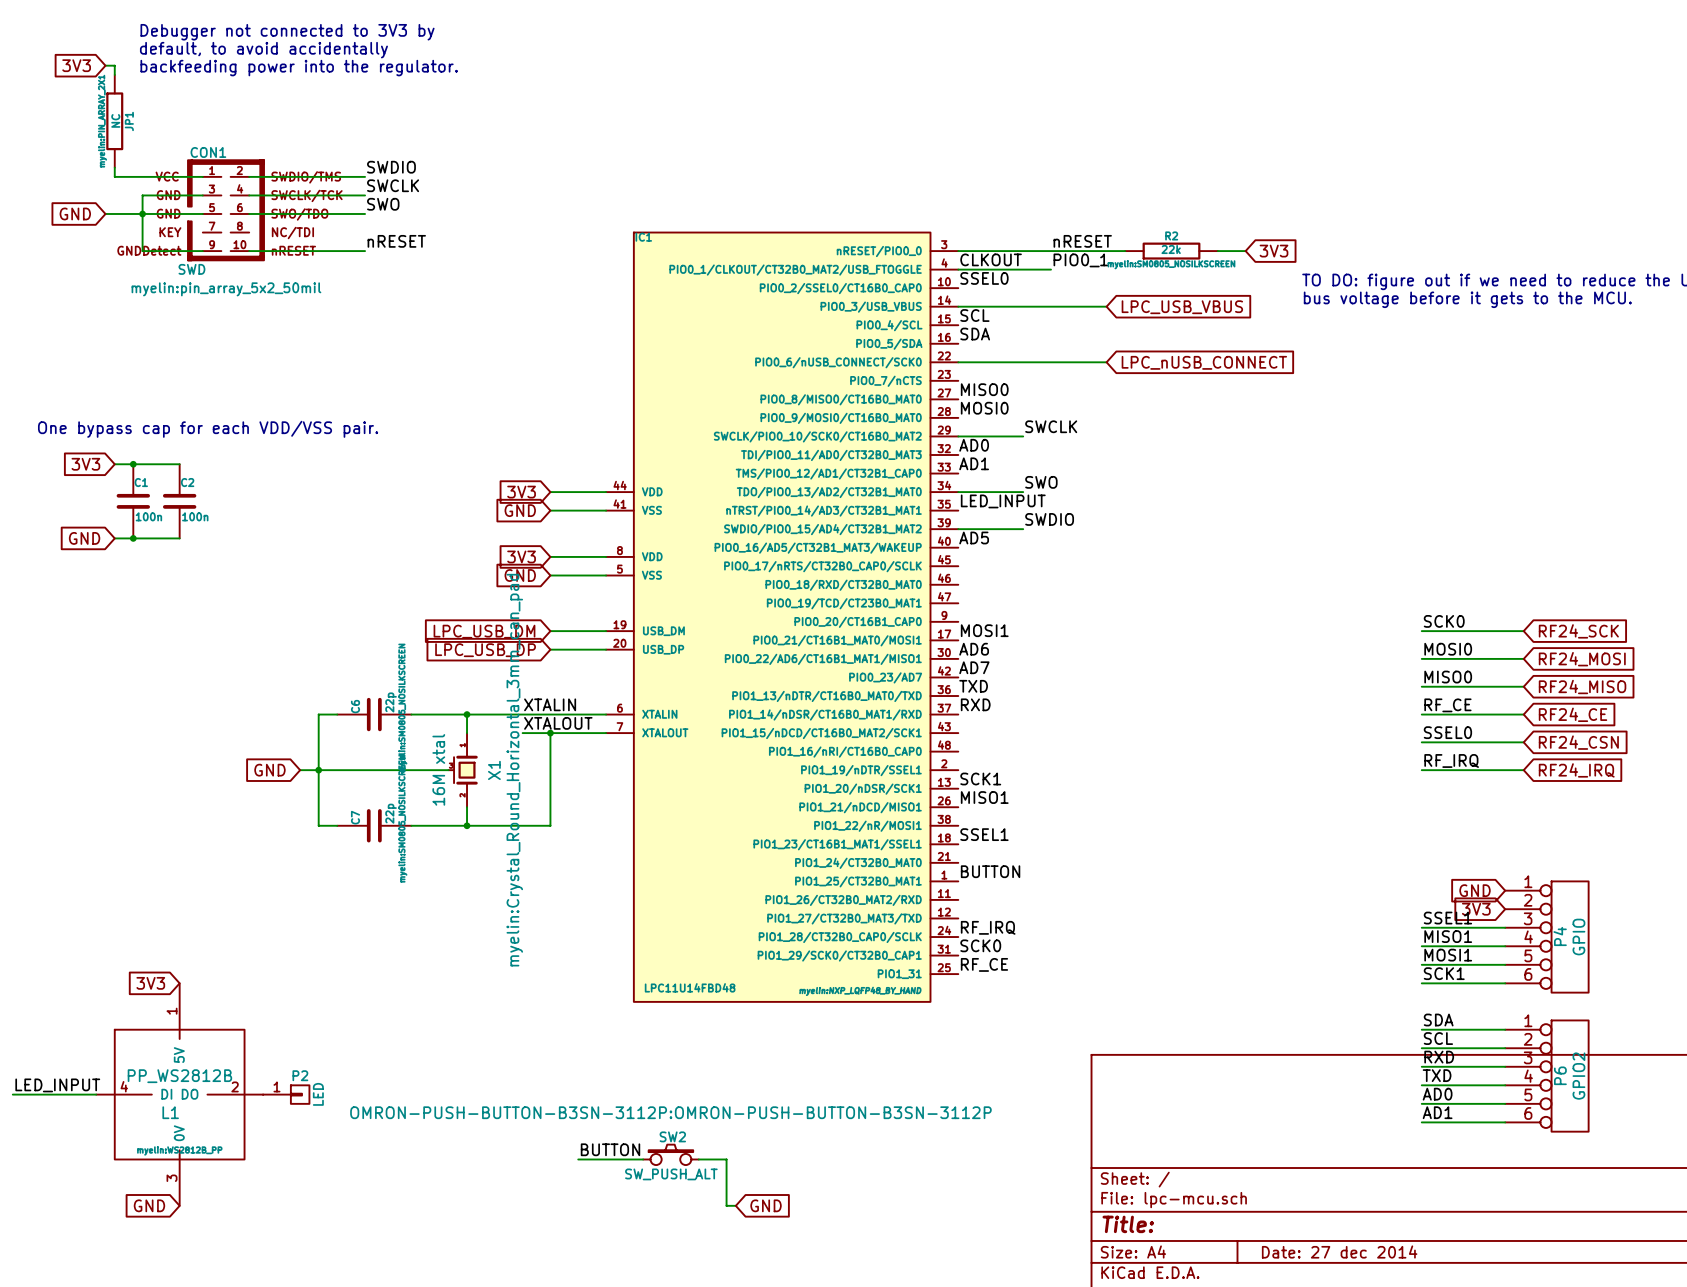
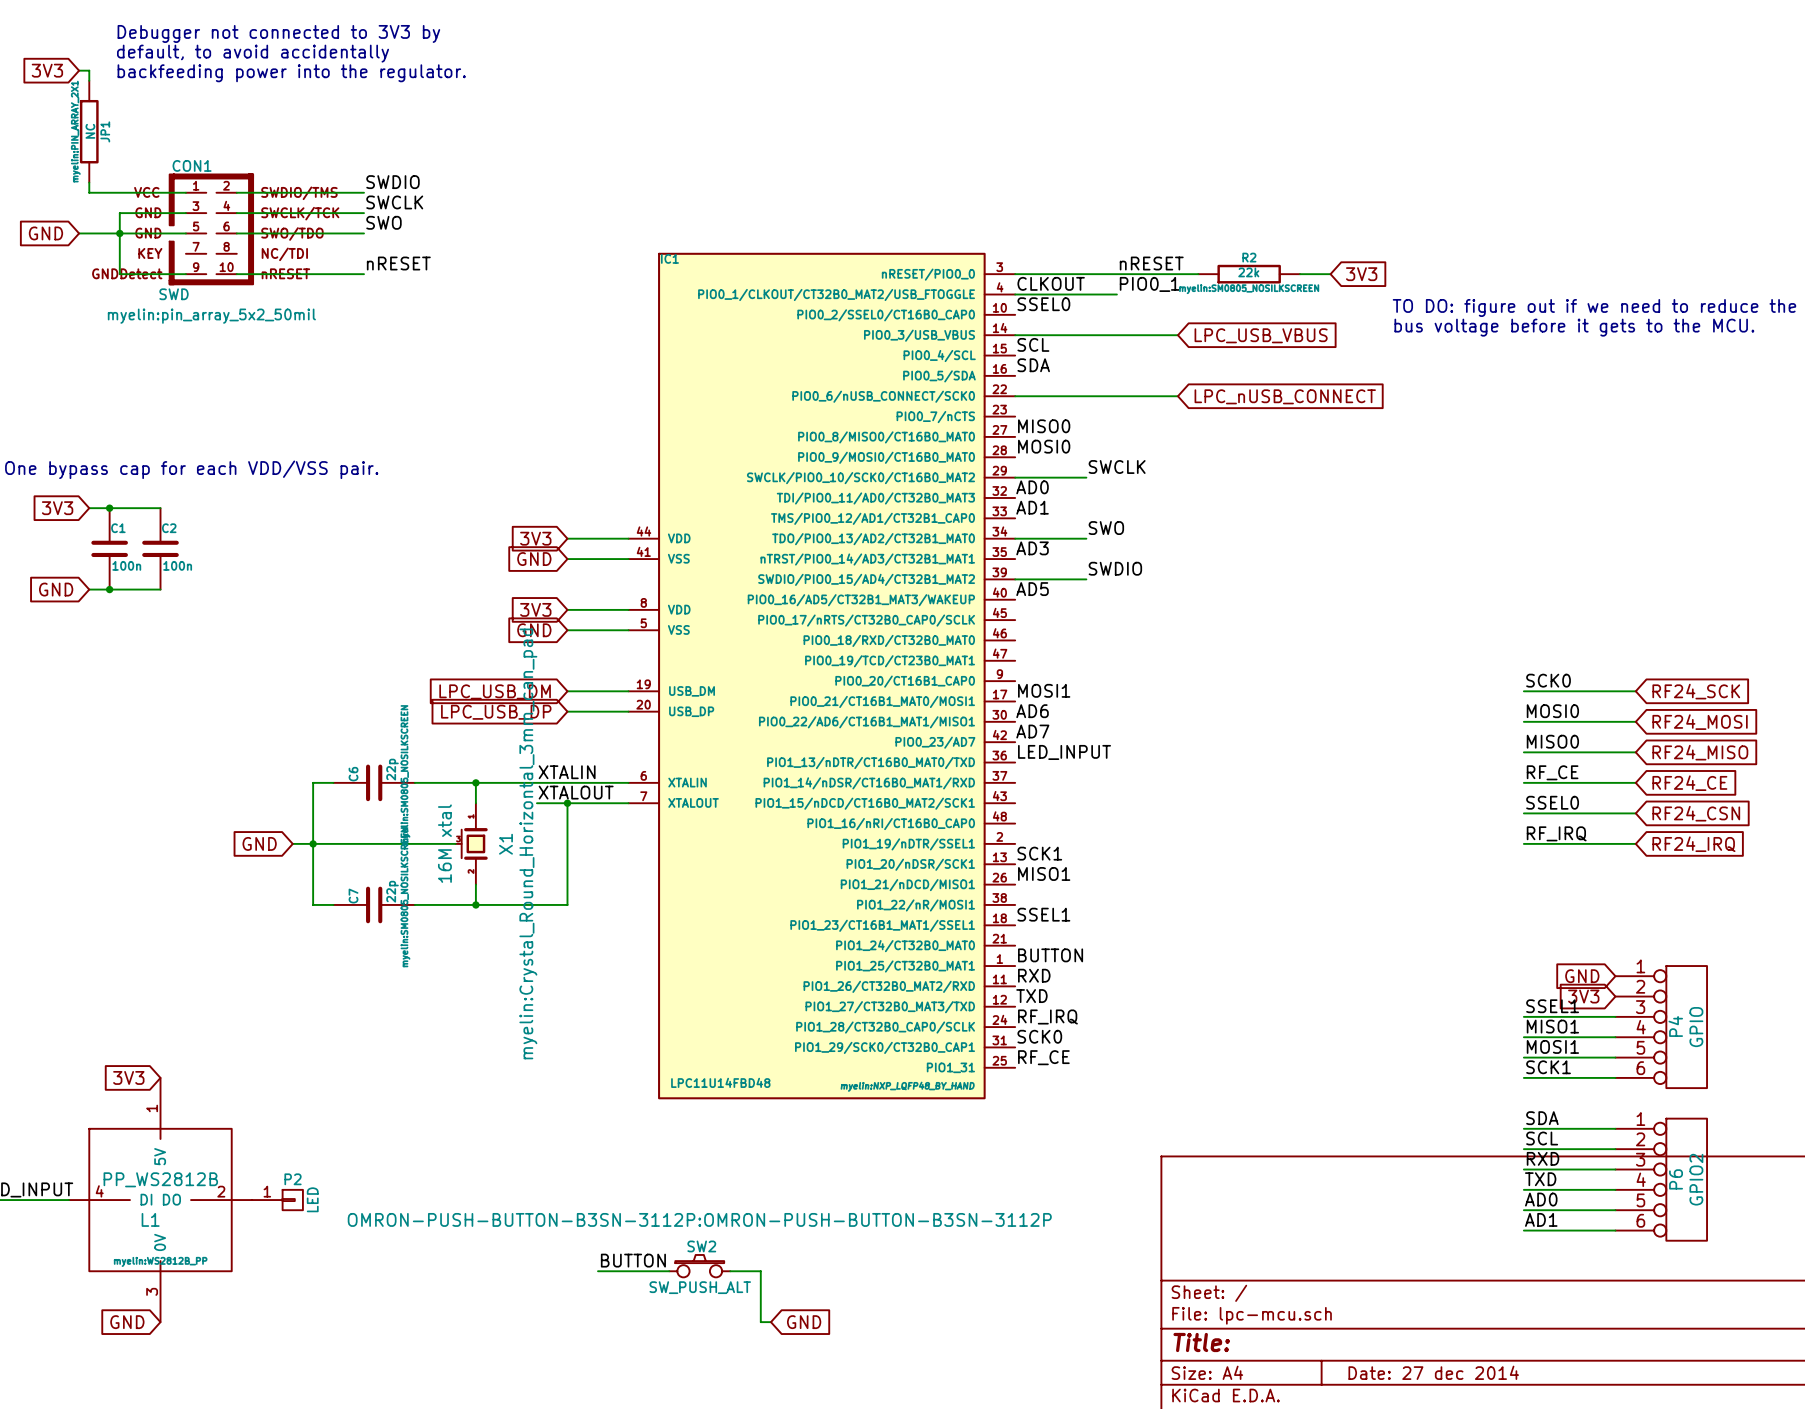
label: LED_INPUT (1003, 501) -> AD3 (1032, 548)
label: TXD (973, 686) -> LED_INPUT (1064, 752)
label: RXD (975, 704) -> none
label: none -> RXD (1034, 975)
label: none -> TXD (1031, 996)

